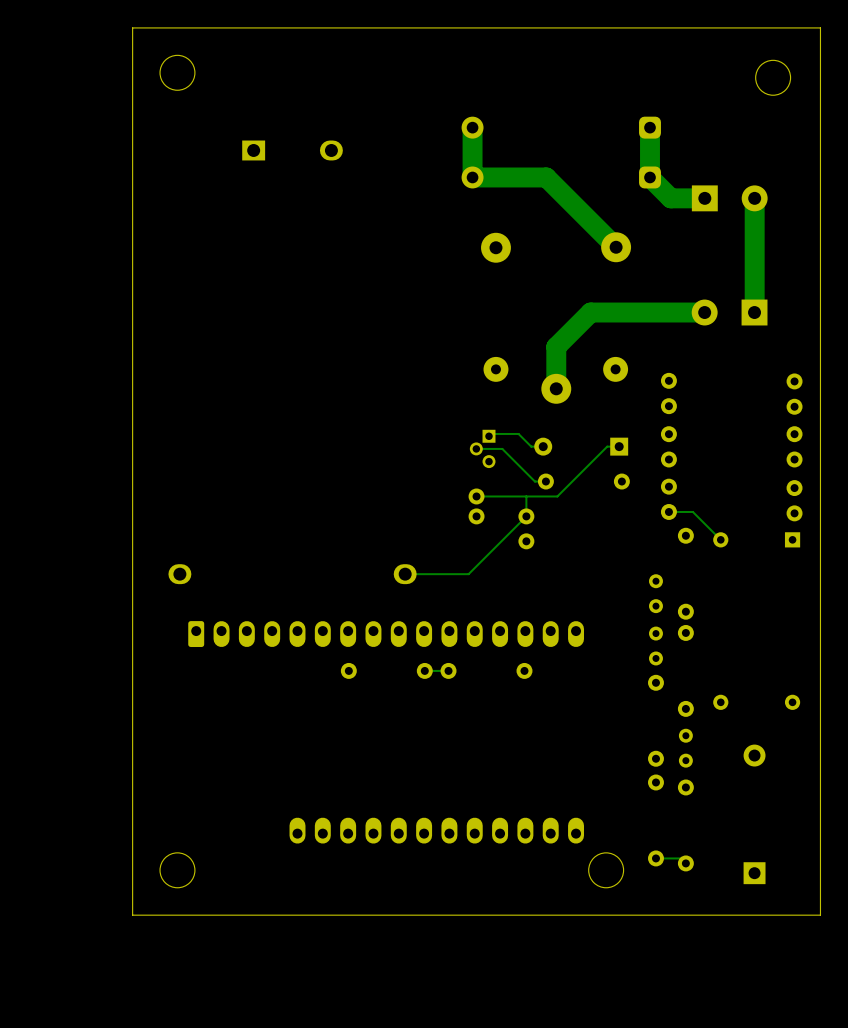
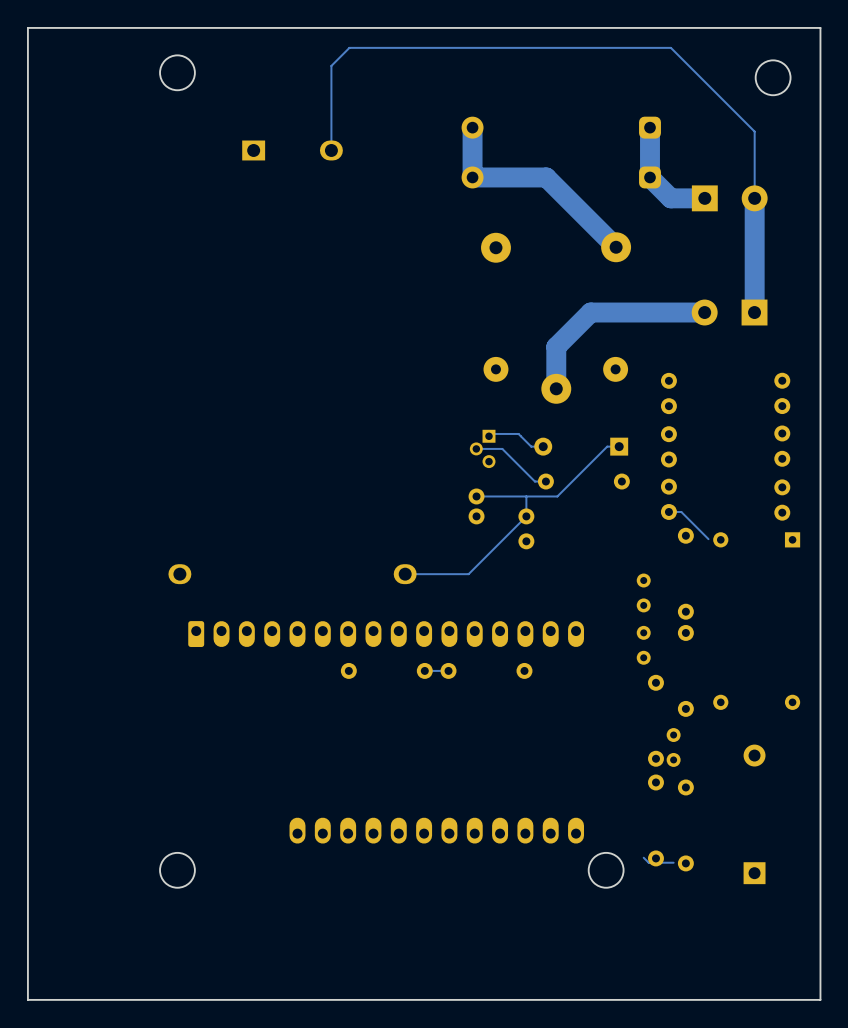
board edge: (132, 27) (132, 915) (820, 915) -> (132, 27) (27, 27) (27, 999) (820, 999) (820, 915)
track: none -> (331, 150) (331, 65) (349, 47) (670, 47) (754, 131) (754, 198)
part position: (794, 394) -> (782, 393)
part position: (794, 446) -> (782, 446)
part position: (794, 500) -> (782, 500)
track: (681, 511) (692, 511) (720, 539) -> (681, 511) (708, 539)
part position: (655, 593) -> (643, 592)
part position: (655, 646) -> (643, 645)
part position: (685, 748) -> (673, 747)
track: none -> (643, 857) (648, 862) (673, 862)
track: (685, 858) (655, 858) -> none

